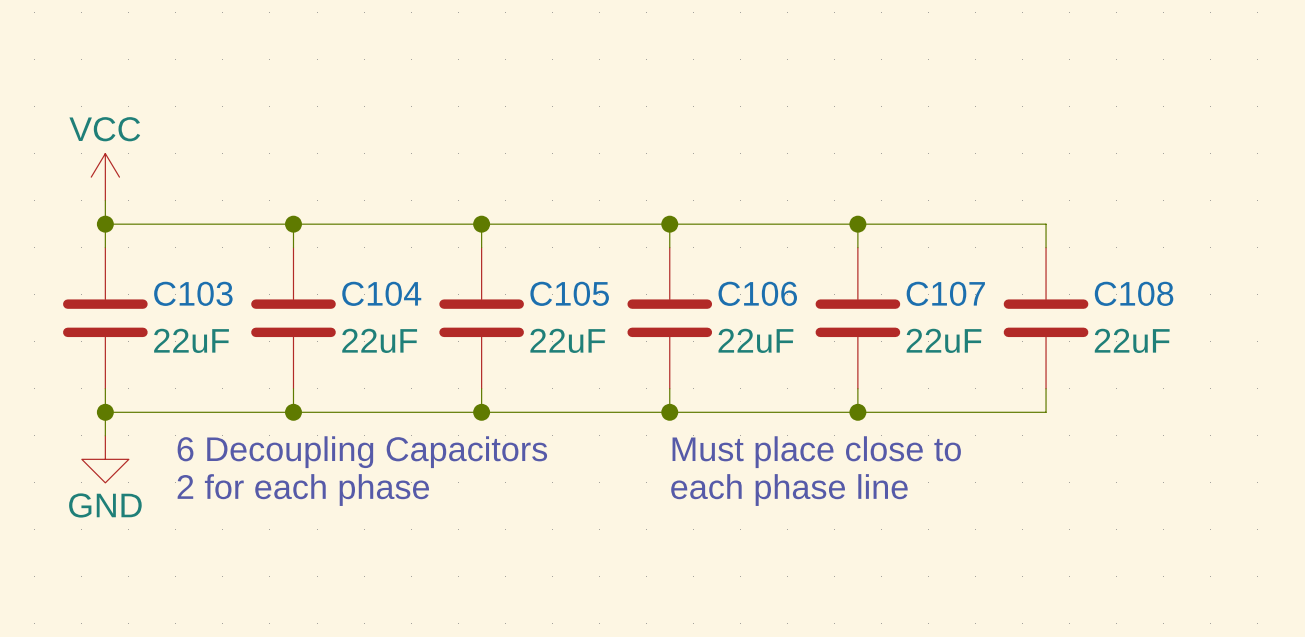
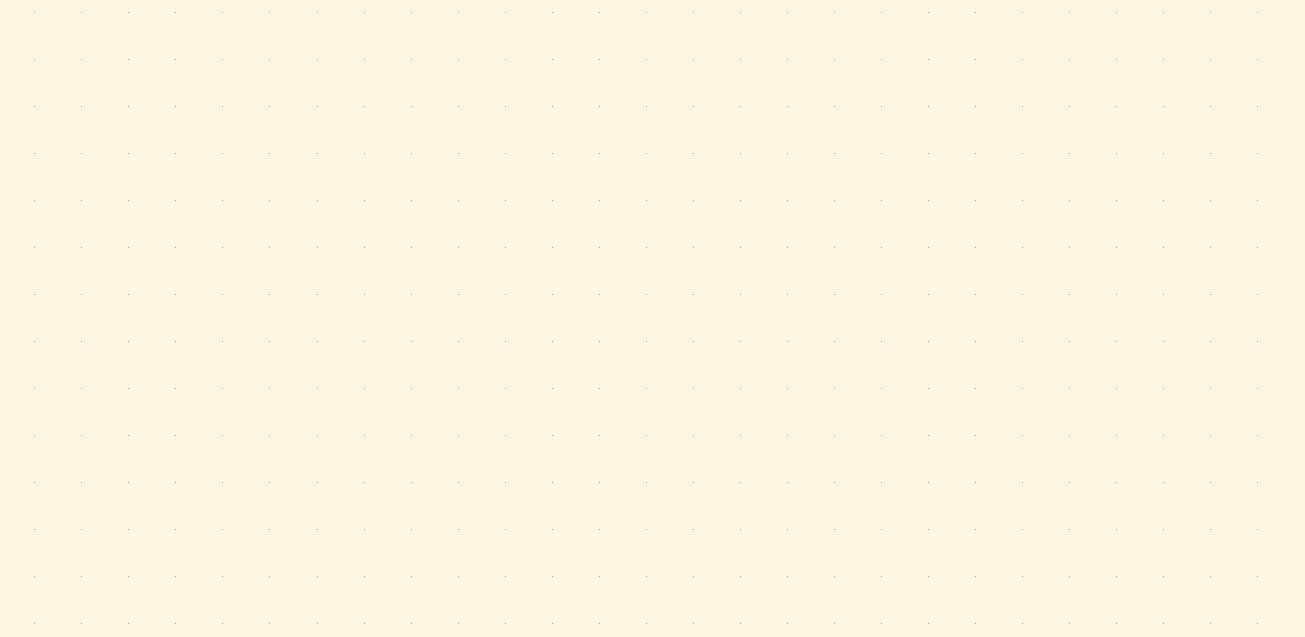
power symbol: VCC (105, 177) -> none
wire: (105, 200) (105, 247) -> none
wire: (105, 224) (1046, 224) (1046, 247) -> none
junction: (105, 224) -> none
wire: (293, 224) (293, 247) -> none
junction: (293, 224) -> none
wire: (481, 224) (481, 247) -> none
junction: (481, 224) -> none
wire: (669, 224) (669, 247) -> none
junction: (669, 224) -> none
wire: (857, 224) (857, 247) -> none
junction: (857, 224) -> none
C103: 22uF (105, 318) -> none
C104: 22uF (293, 318) -> none
C105: 22uF (481, 318) -> none
C106: 22uF (669, 318) -> none
C107: 22uF (857, 318) -> none
C108: 22uF (1046, 318) -> none
wire: (105, 388) (105, 435) -> none
wire: (293, 388) (293, 412) -> none
wire: (481, 388) (481, 412) -> none
wire: (669, 388) (669, 412) -> none
wire: (857, 388) (857, 412) -> none
wire: (1046, 388) (1046, 412) (105, 412) -> none
junction: (105, 412) -> none
junction: (293, 412) -> none
junction: (481, 412) -> none
junction: (669, 412) -> none
junction: (857, 412) -> none
text: 6 Decoupling Capacitors (362, 452) -> none
text: Must place close to (816, 452) -> none
power symbol: GND (105, 459) -> none
text: 2 for each phase (303, 490) -> none
text: each phase line (789, 490) -> none

